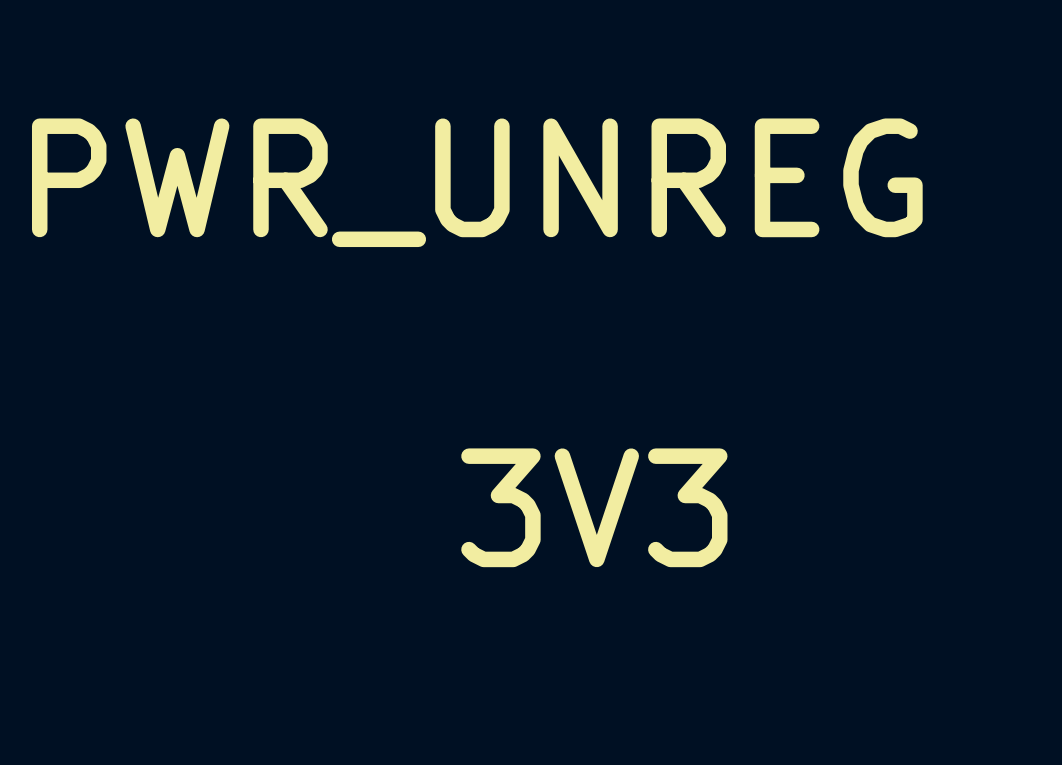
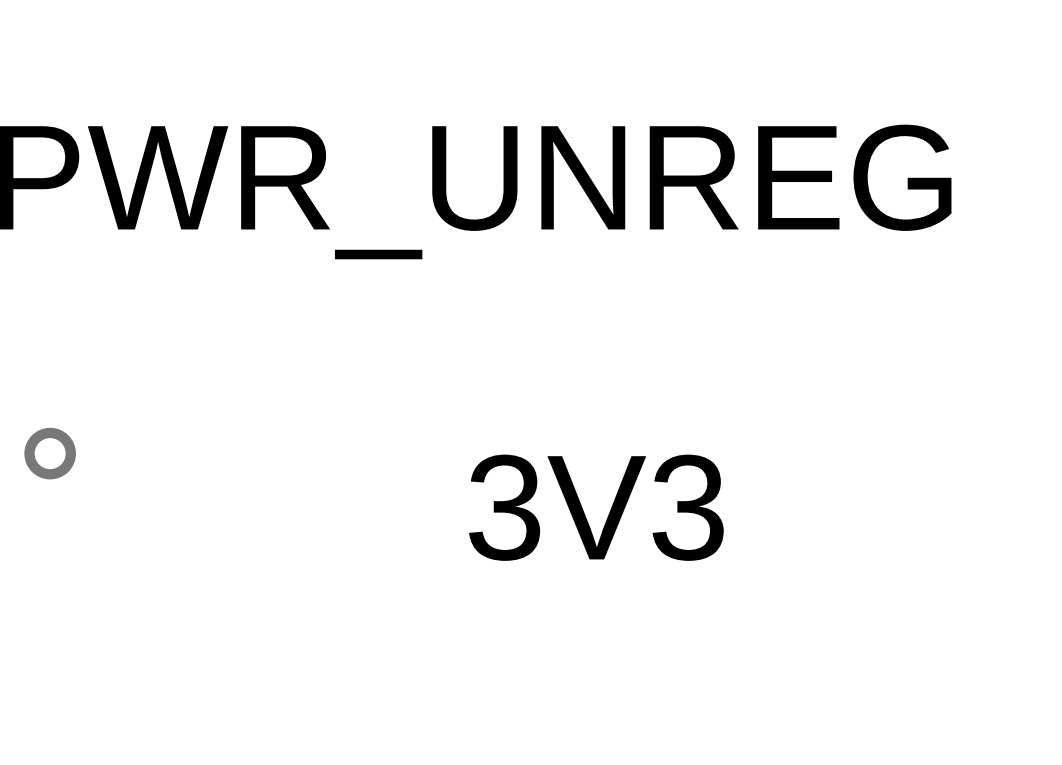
via: none -> (50, 453)

